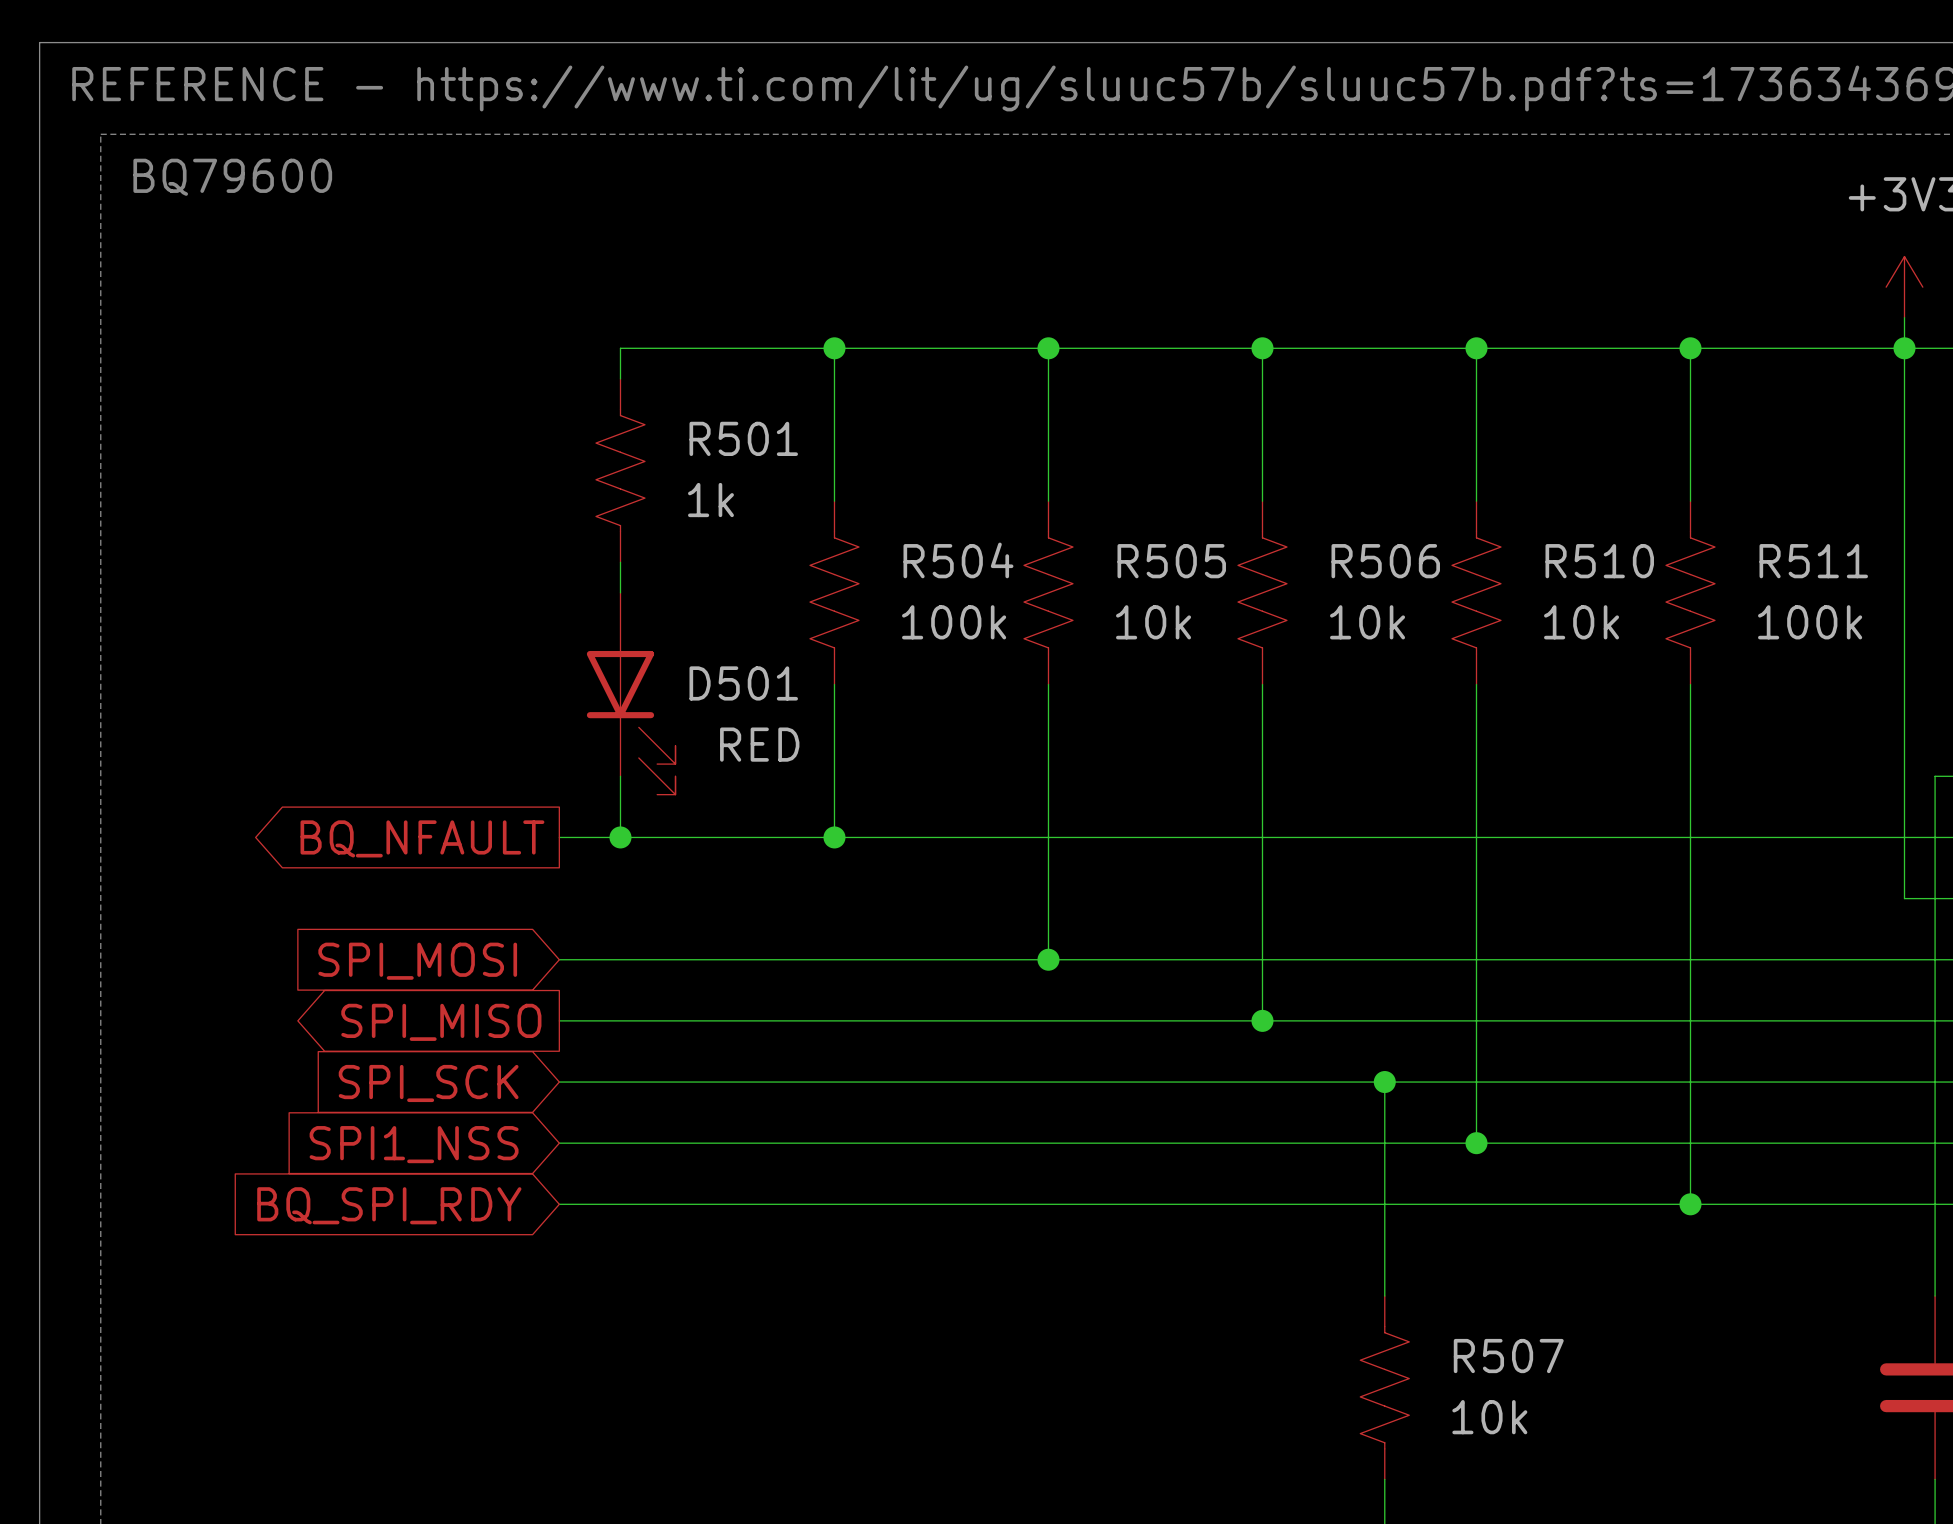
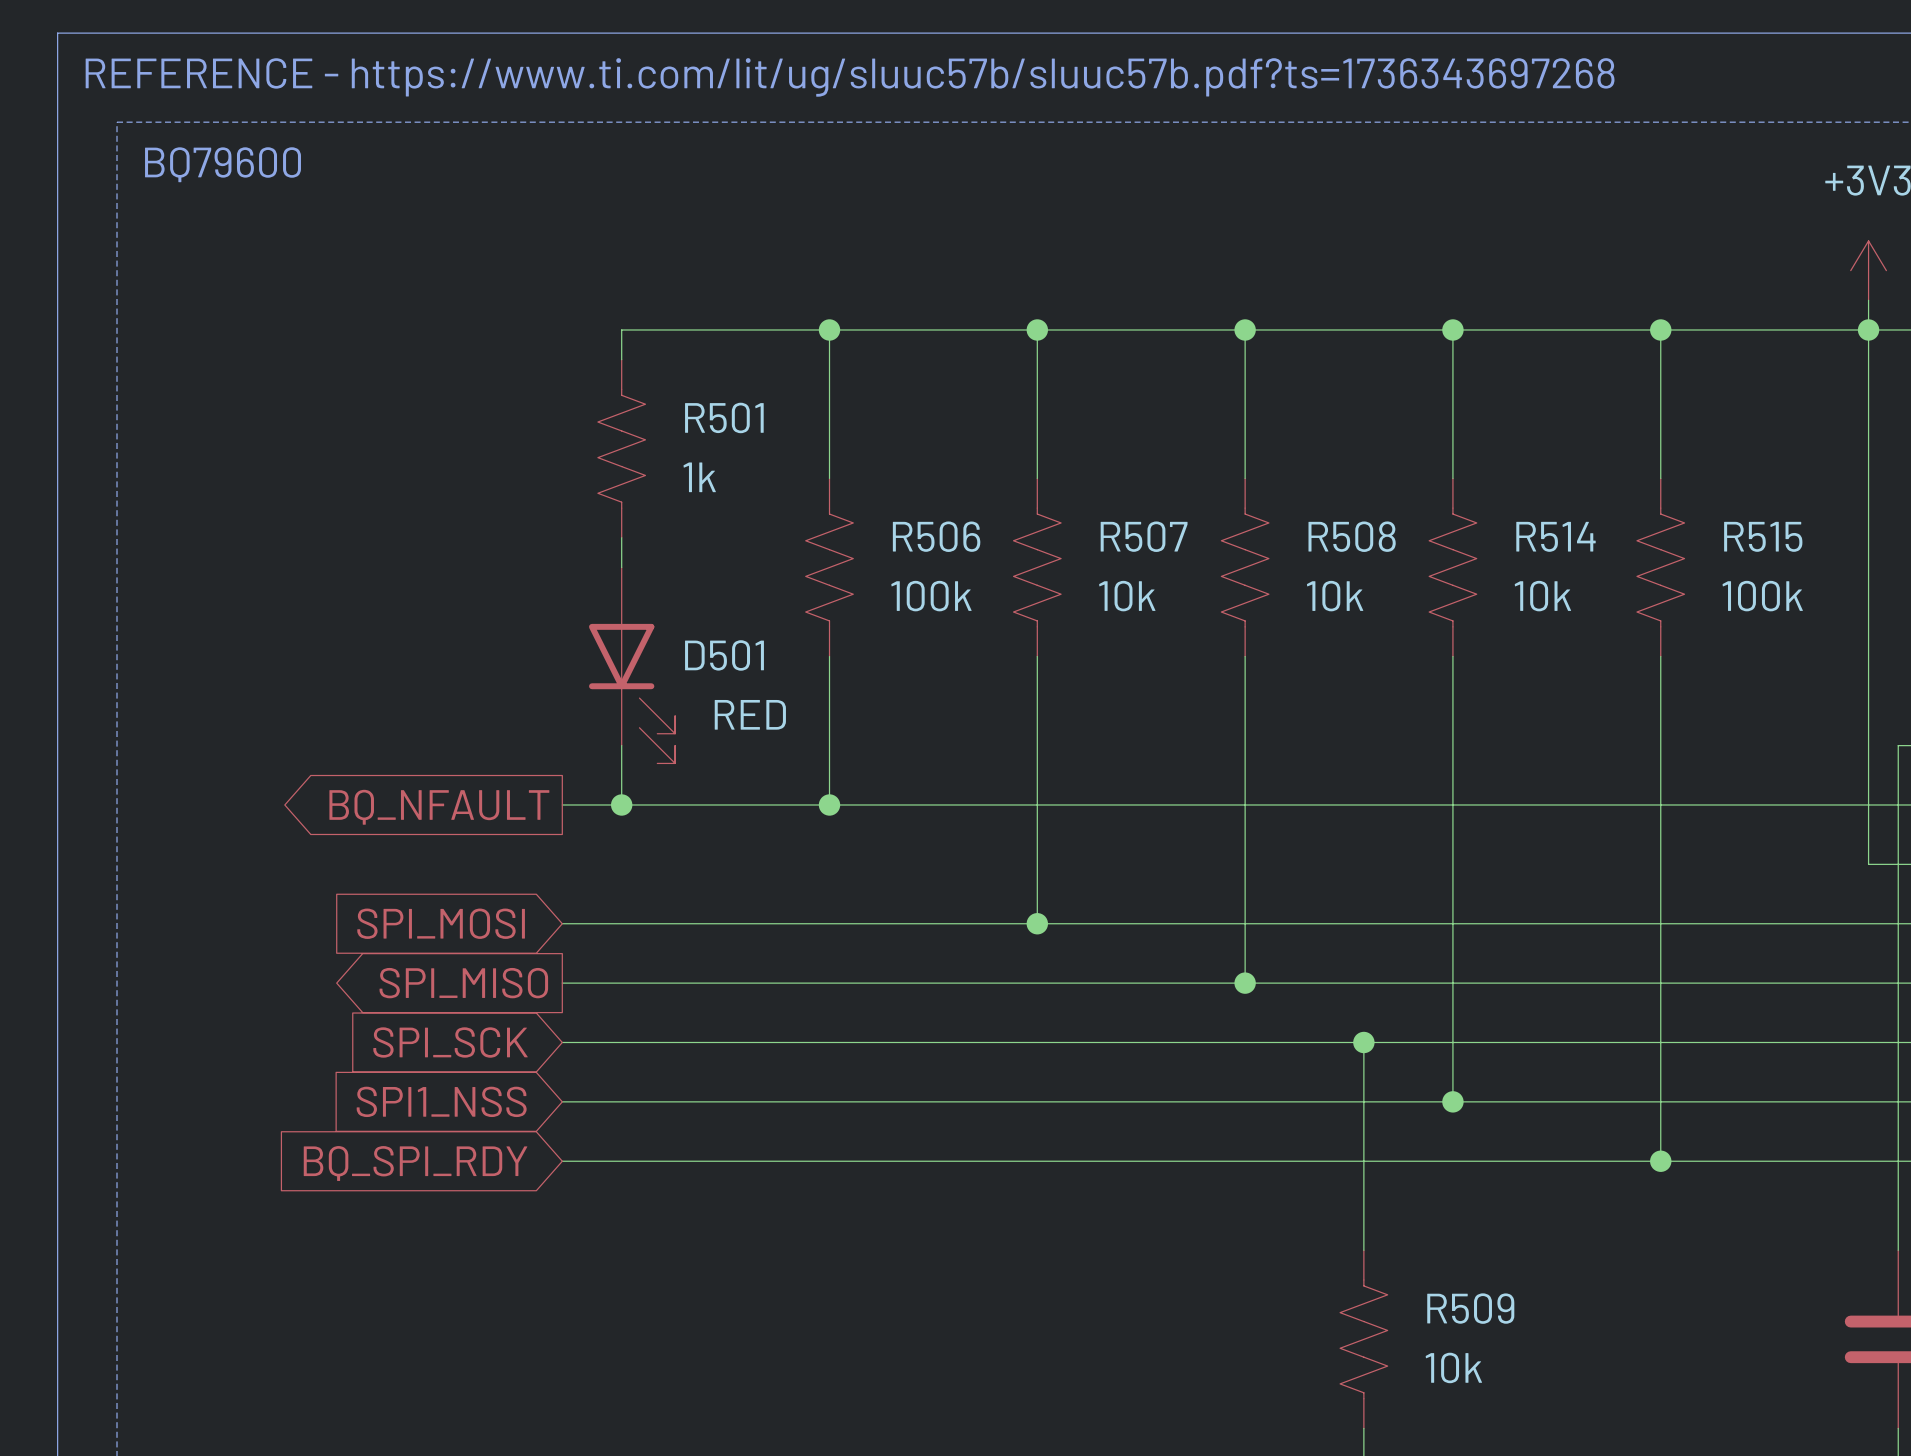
R504 name: R504 (958, 560) -> R506 (936, 536)
R505 name: R505 (1171, 561) -> R507 (1144, 536)
R506 name: R506 (1385, 561) -> R508 (1352, 536)
R510 name: R510 (1599, 561) -> R514 (1556, 536)
R511 name: R511 (1813, 561) -> R515 (1763, 536)
R507 name: R507 (1508, 1356) -> R509 (1470, 1308)

